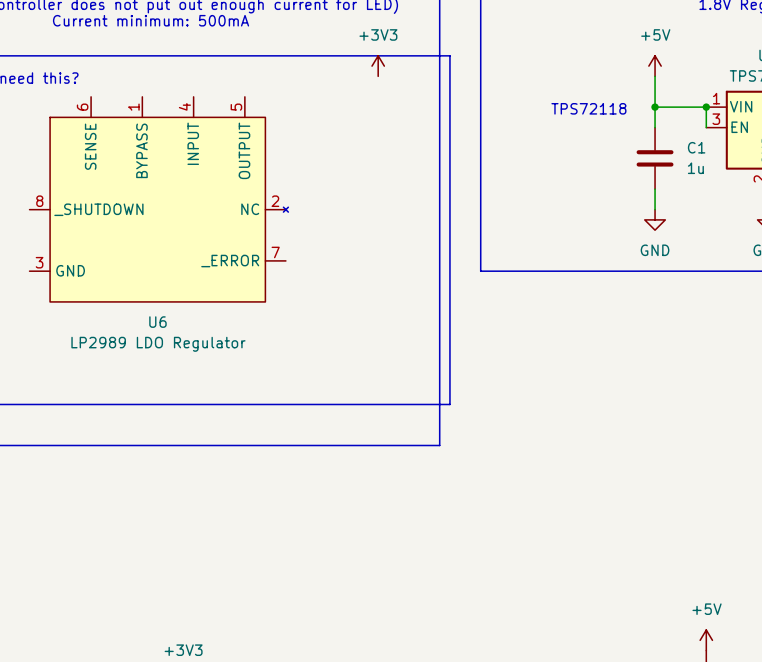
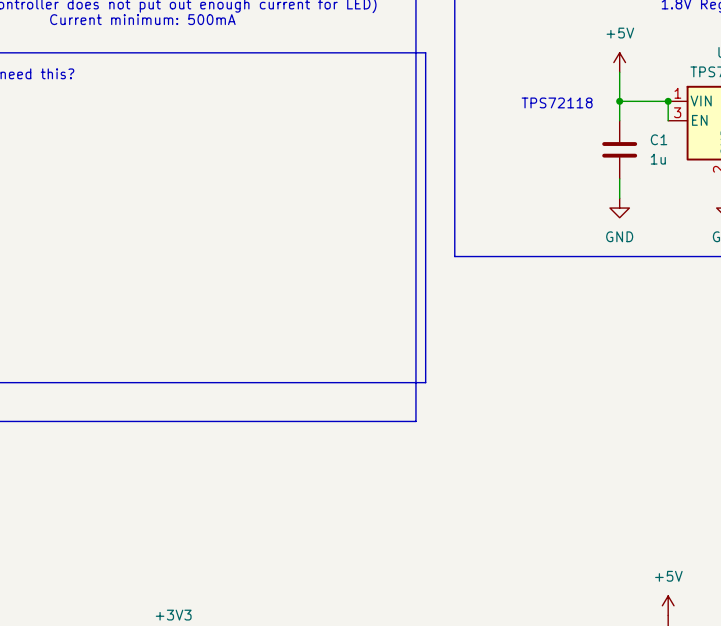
power symbol: +3V3 (378, 66) -> none
U6: LP2989 LDO Regulator (158, 199) -> none

